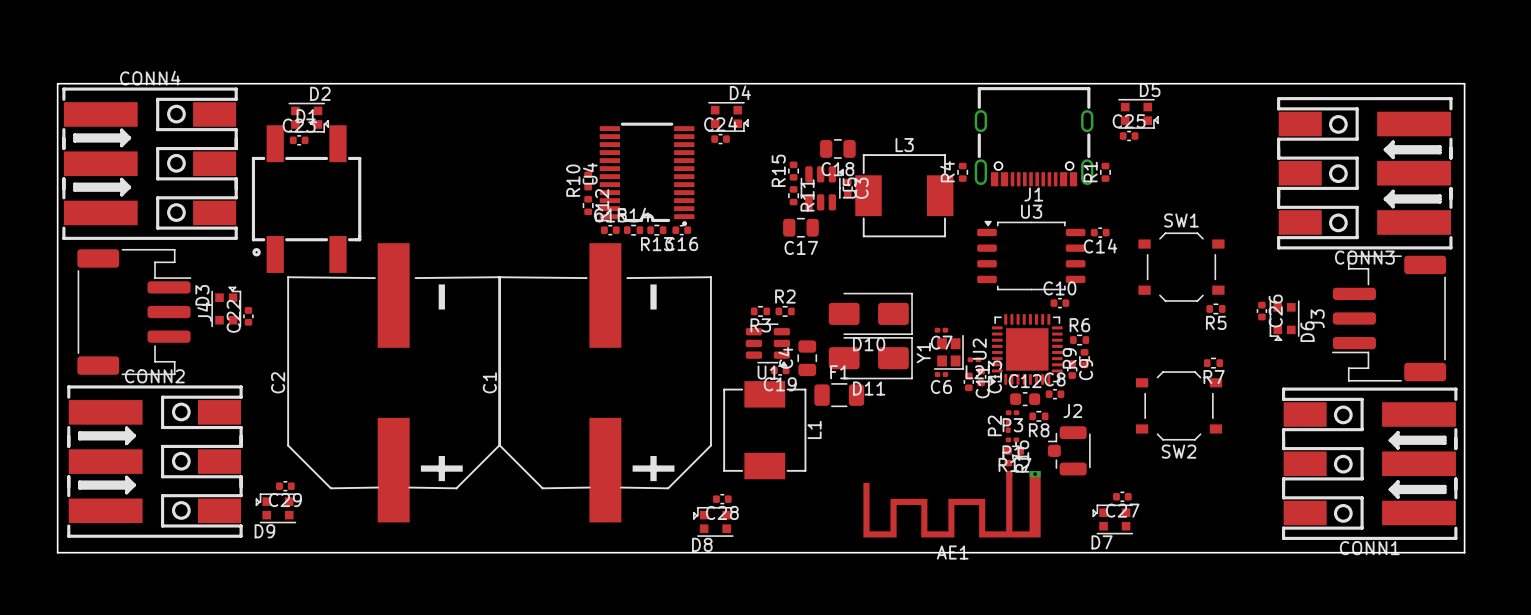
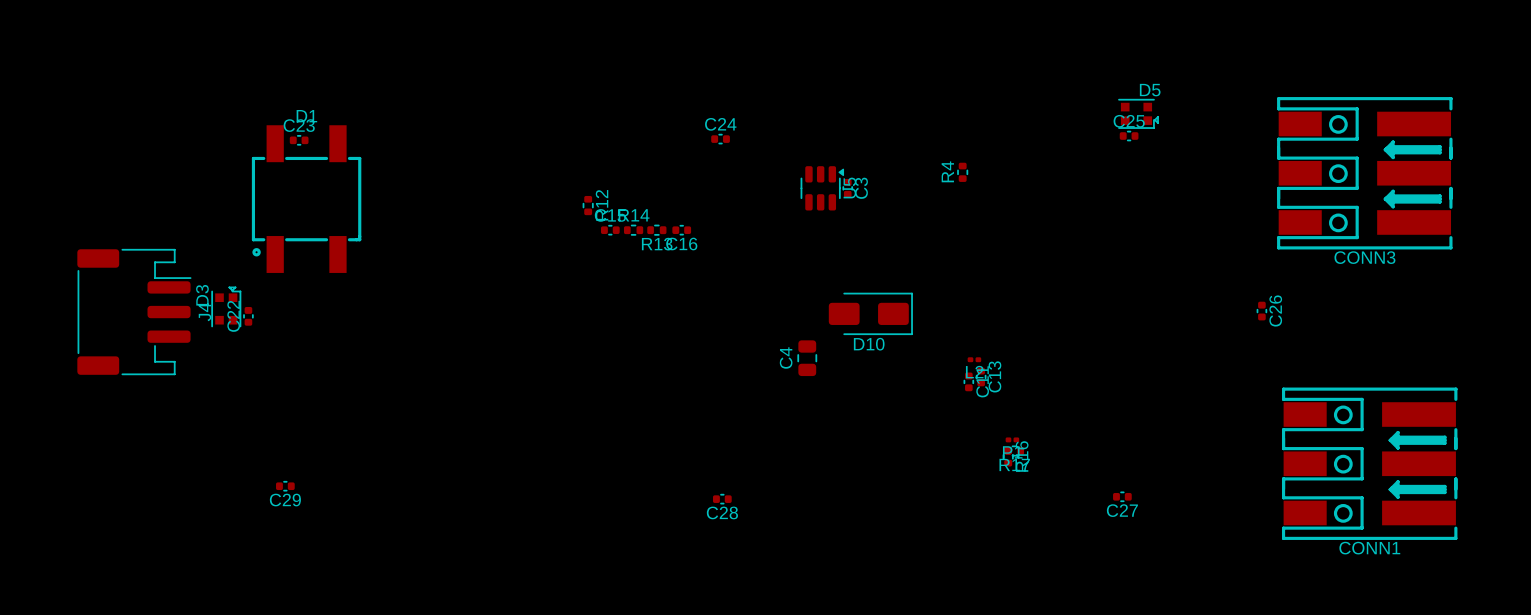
board edge: (57, 83) (57, 552) (1464, 552) (1464, 83) (57, 83) -> none
D4: (728, 116) -> none
D2: (308, 117) -> none
J1: (1034, 136) -> none
C18: (837, 148) -> none
CONN4: (149, 163) -> none
R15: (793, 171) -> none
R1: (1105, 172) -> none
U4: (647, 174) -> none
R10: (588, 180) -> none
R11: (793, 195) -> none
L3: (904, 195) -> none
C17: (800, 227) -> none
C14: (1100, 232) -> none
U3: (1031, 255) -> none
SW1: (1181, 267) -> none
C10: (1059, 303) -> none
R5: (1215, 308) -> none
R3: (760, 311) -> none
R2: (785, 311) -> none
J3: (1389, 318) -> none
D6: (1284, 320) -> none
C7: (941, 330) -> none
R6: (1079, 340) -> none
U1: (767, 345) -> none
U2: (1026, 349) -> none
Y1: (948, 352) -> none
D11: (870, 358) -> none
R9: (1084, 358) -> none
R7: (1213, 363) -> none
C9: (1072, 369) -> none
C19: (780, 370) -> none
C6: (941, 374) -> none
C2: (393, 382) -> none
C1: (605, 382) -> none
C8: (1054, 394) -> none
F1: (839, 395) -> none
C12: (1025, 399) -> none
SW2: (1179, 405) -> none
P3: (1012, 412) -> none
R8: (1038, 416) -> none
P2: (1008, 426) -> none
L1: (764, 430) -> none
J2: (1069, 450) -> none
CONN2: (154, 461) -> none
AE1: (952, 504) -> none
D9: (276, 508) -> none
D7: (1112, 519) -> none
D8: (713, 521) -> none

